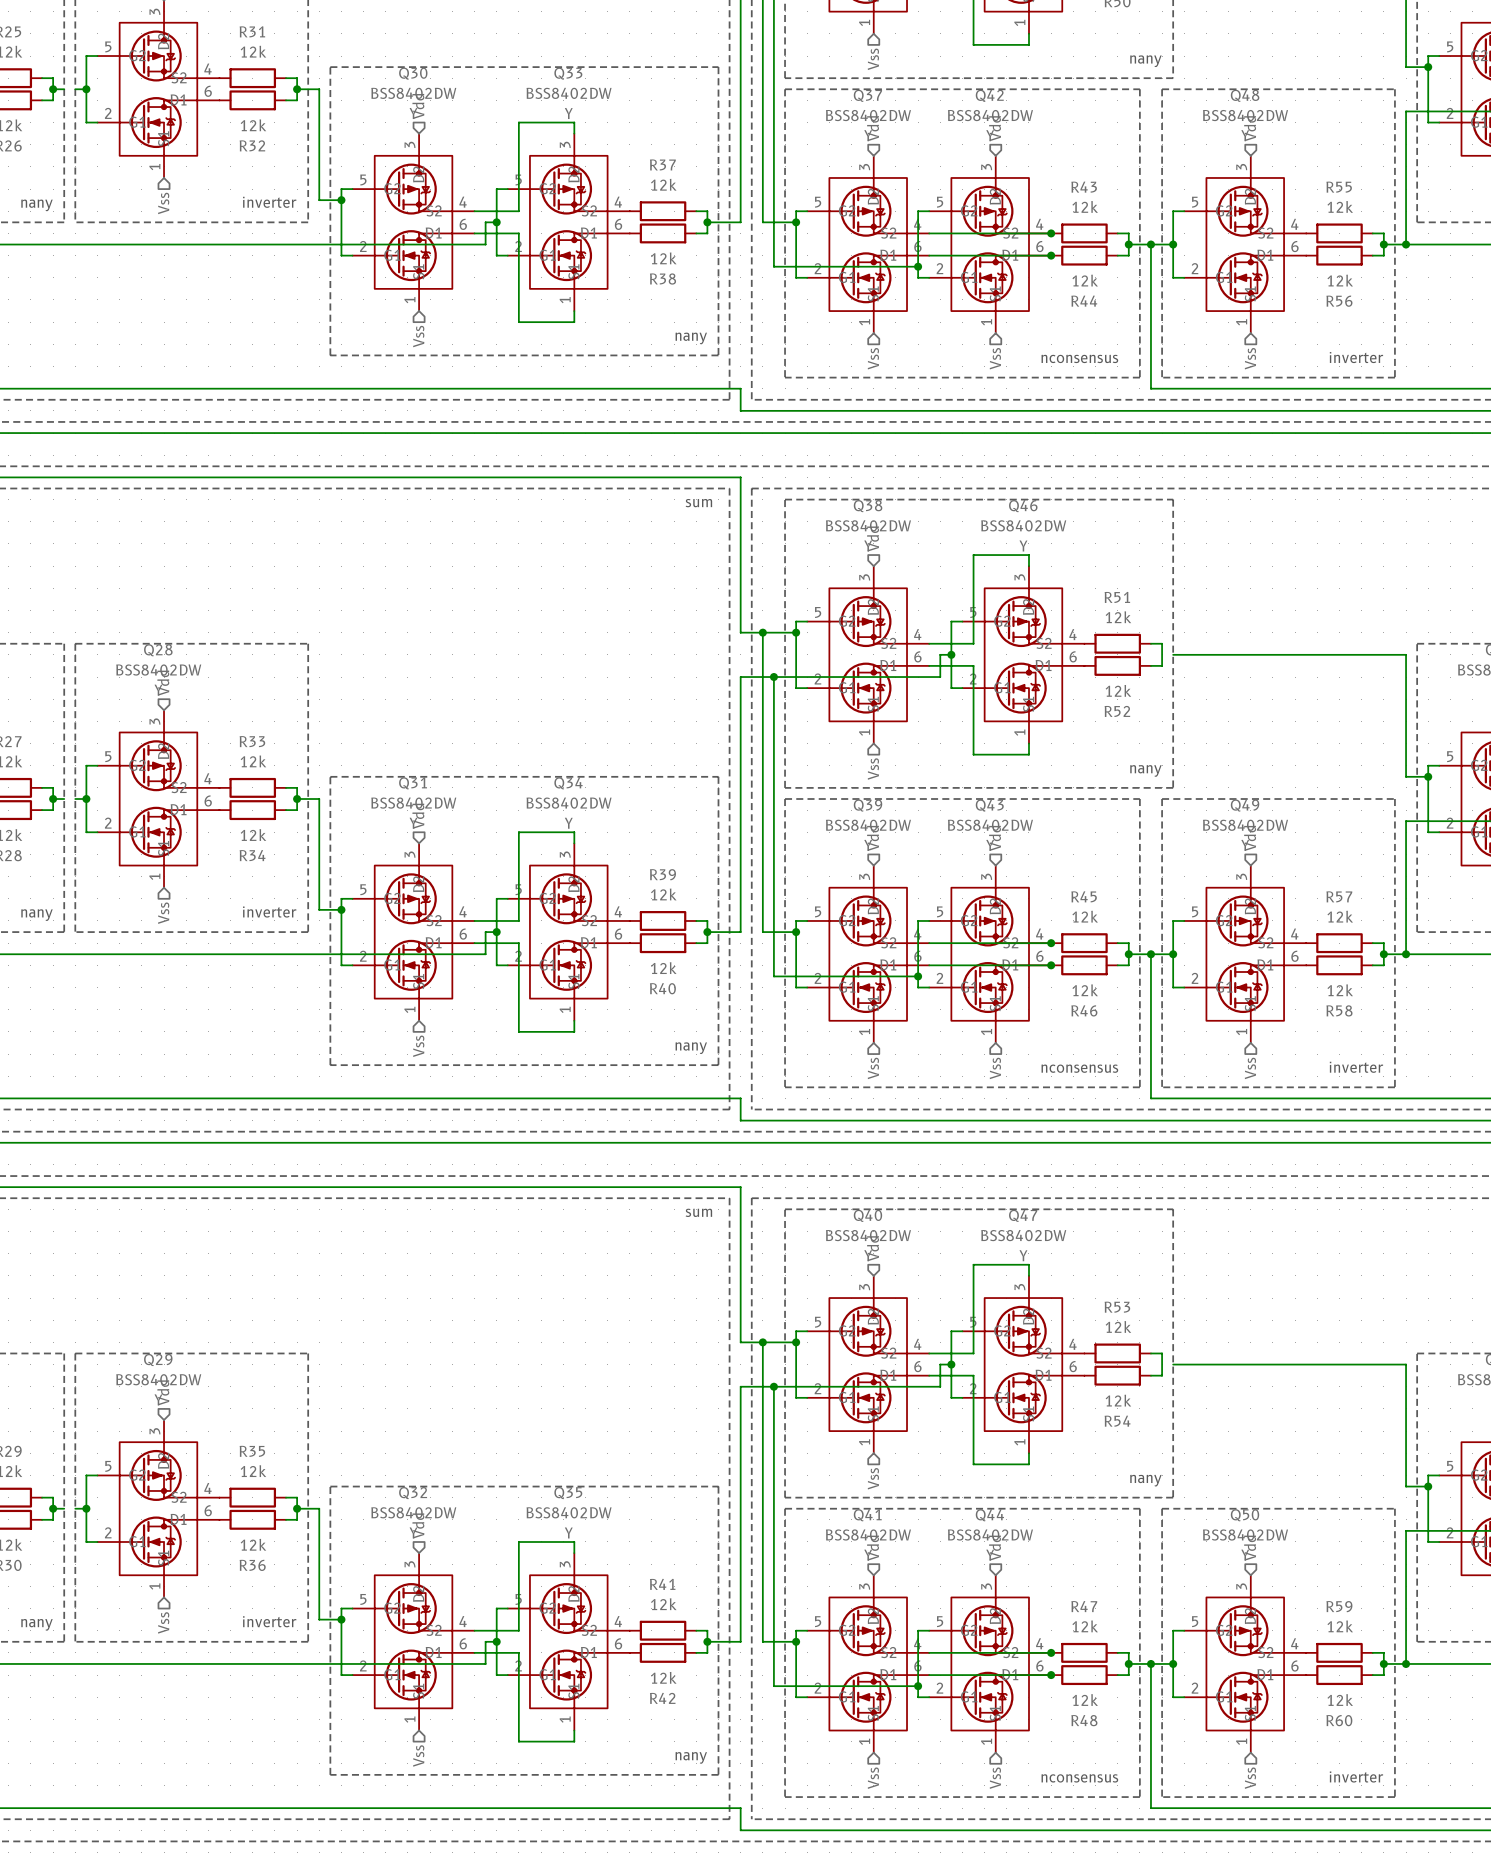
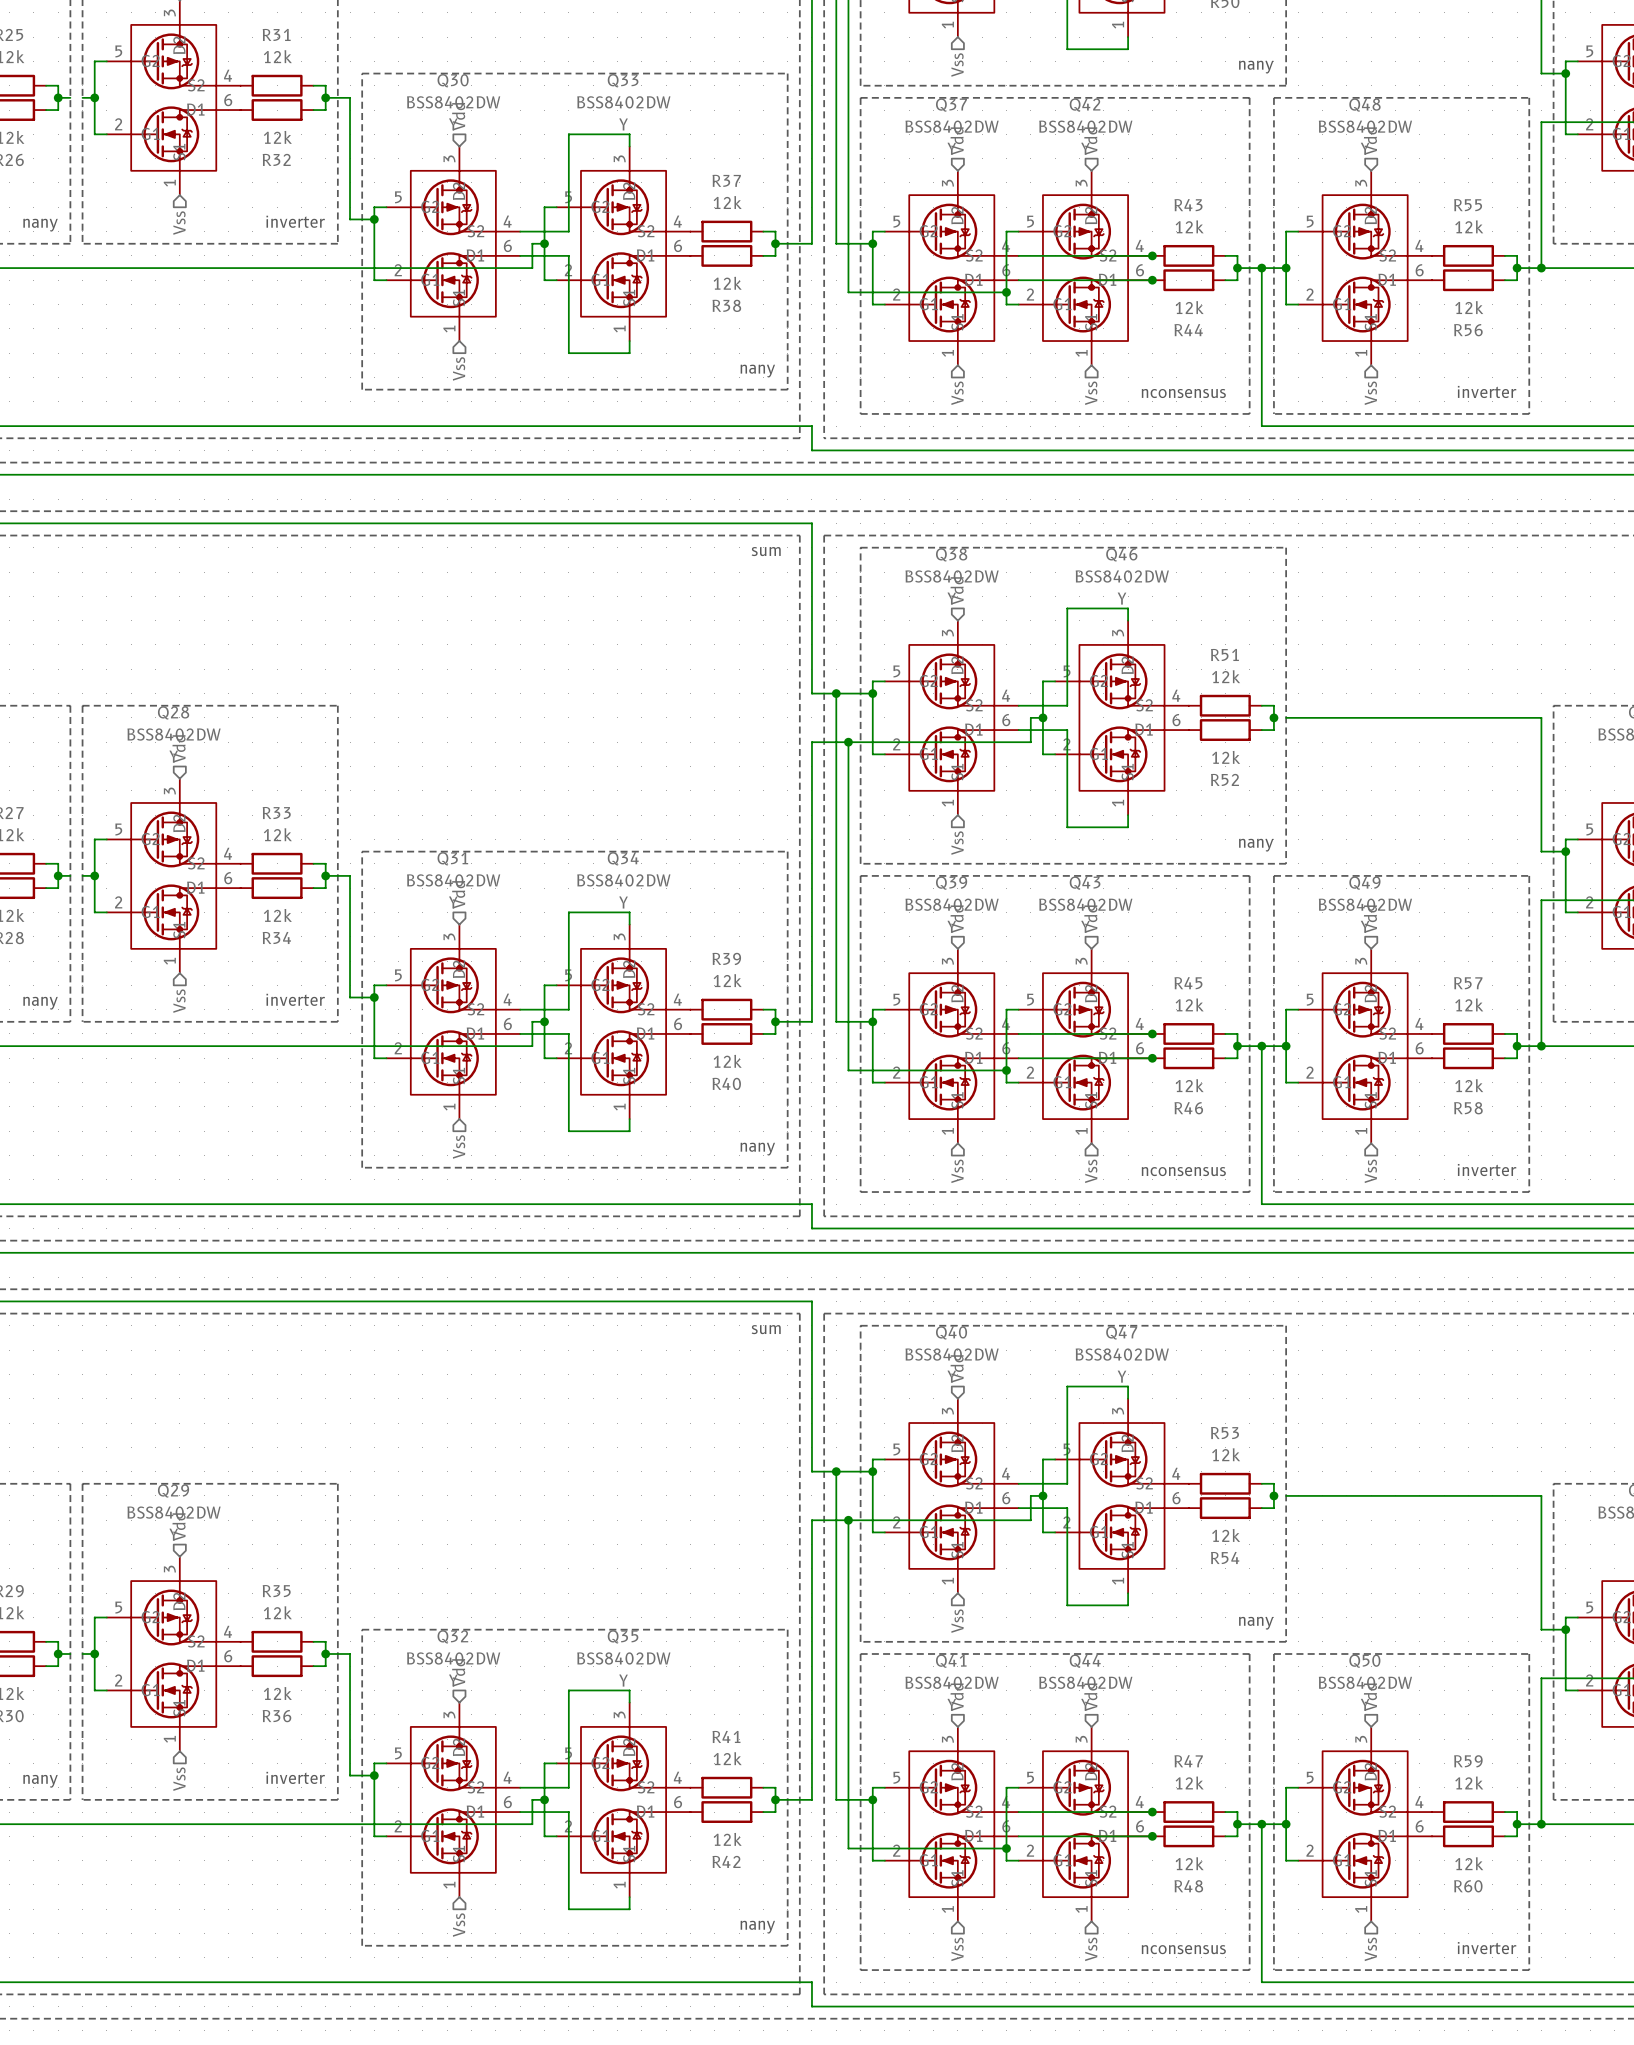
junction: none -> (1273, 717)
junction: none -> (1273, 1495)

